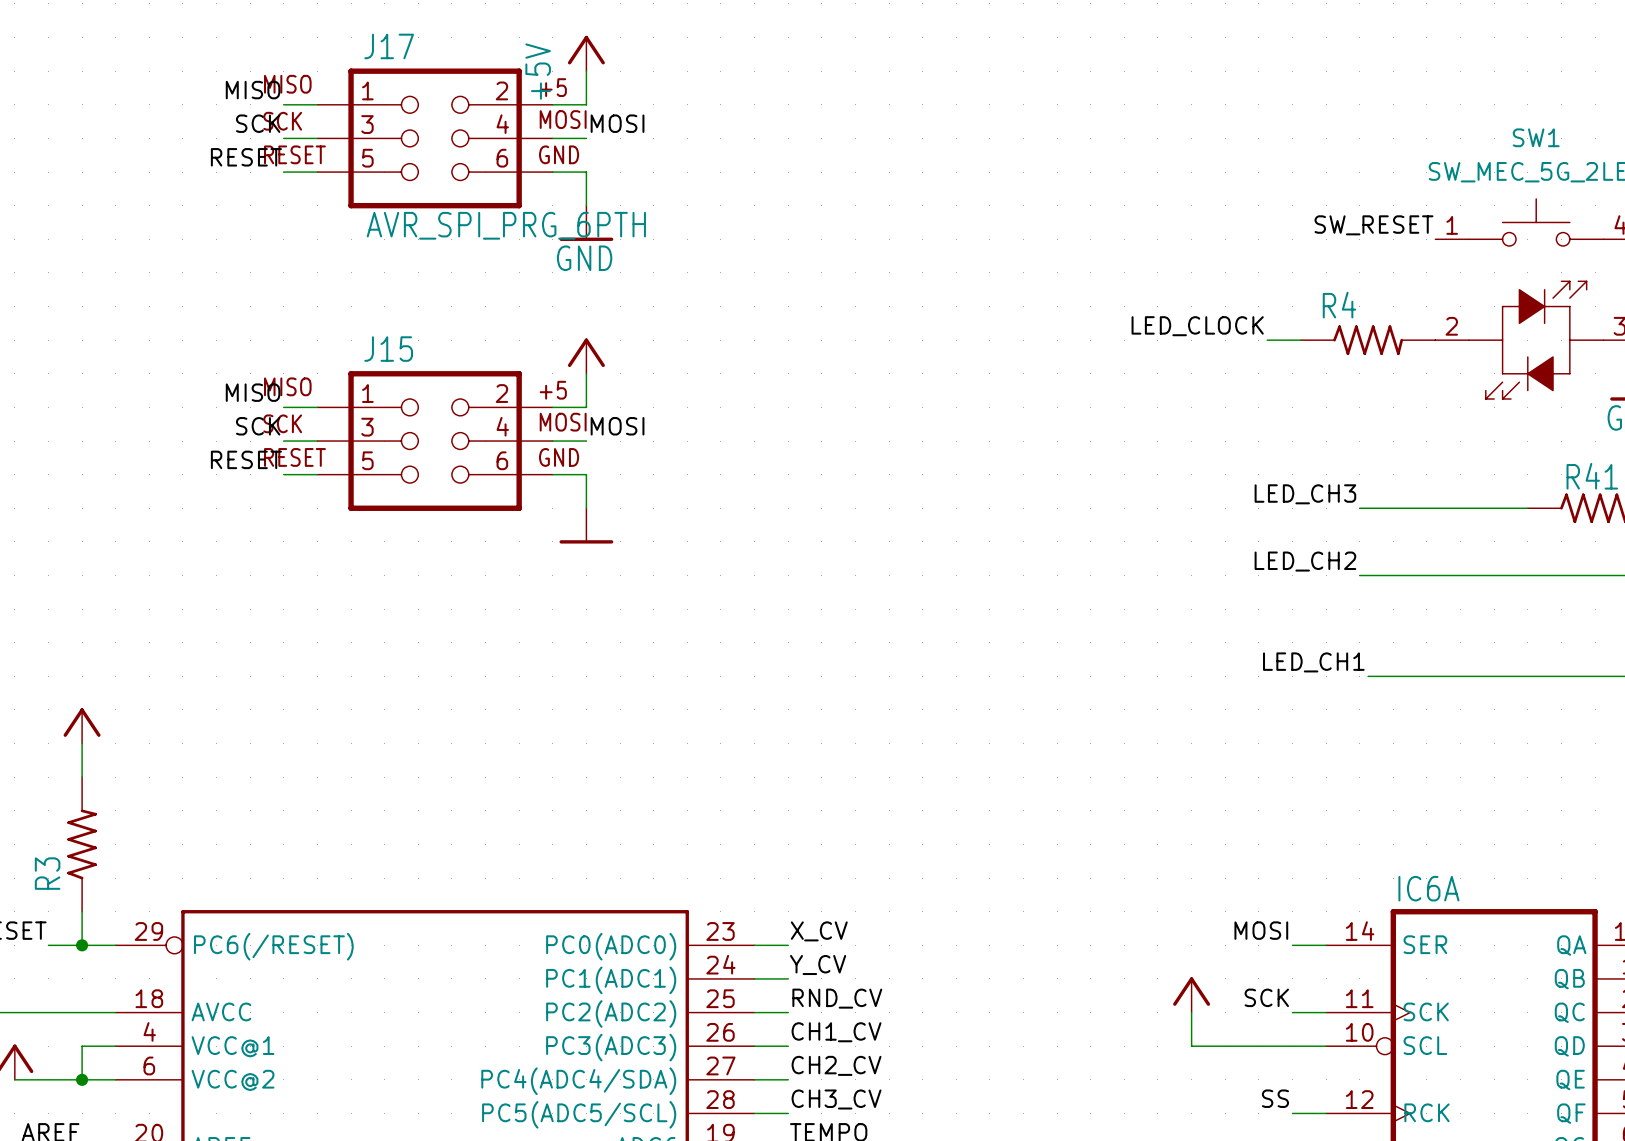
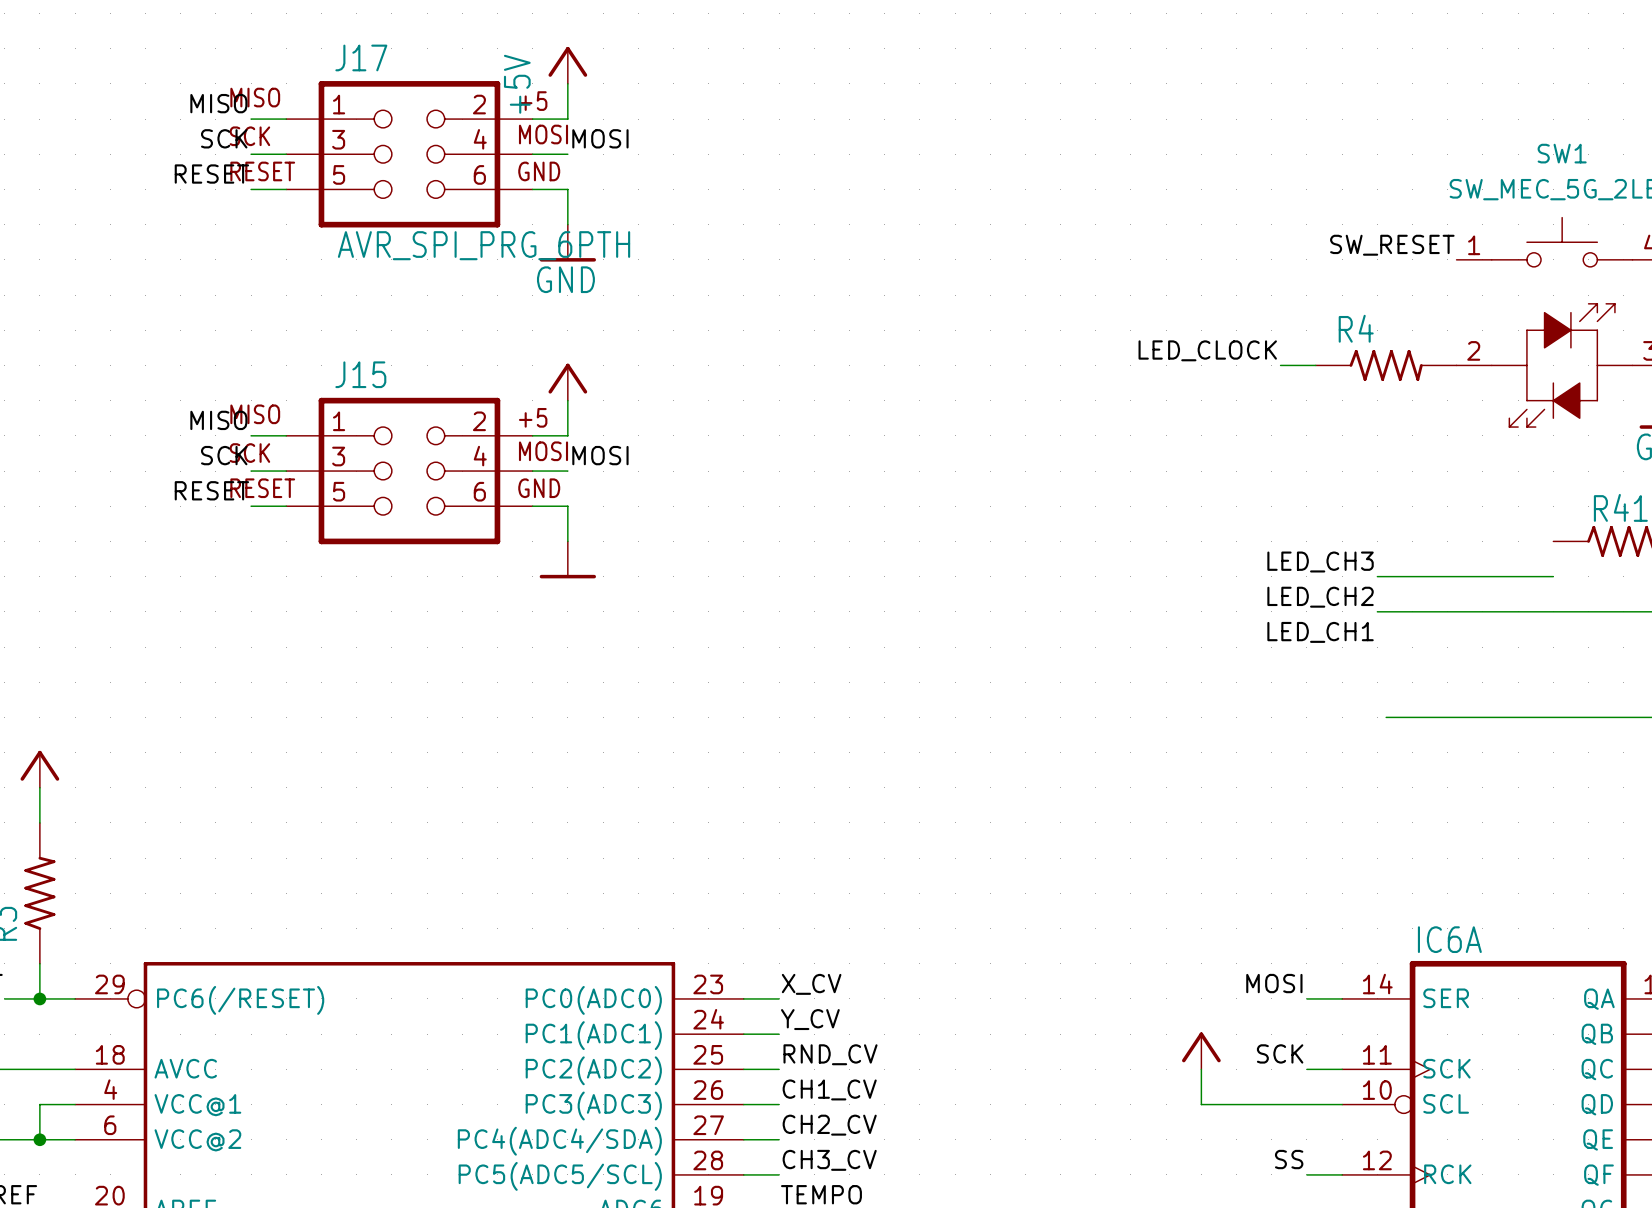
label position: LED_CH3 (1305, 494) -> LED_CH3 (1320, 562)
wire: (1359, 508) (1527, 508) -> (1377, 576) (1553, 576)
label position: LED_CH1 (1313, 662) -> LED_CH1 (1320, 632)

